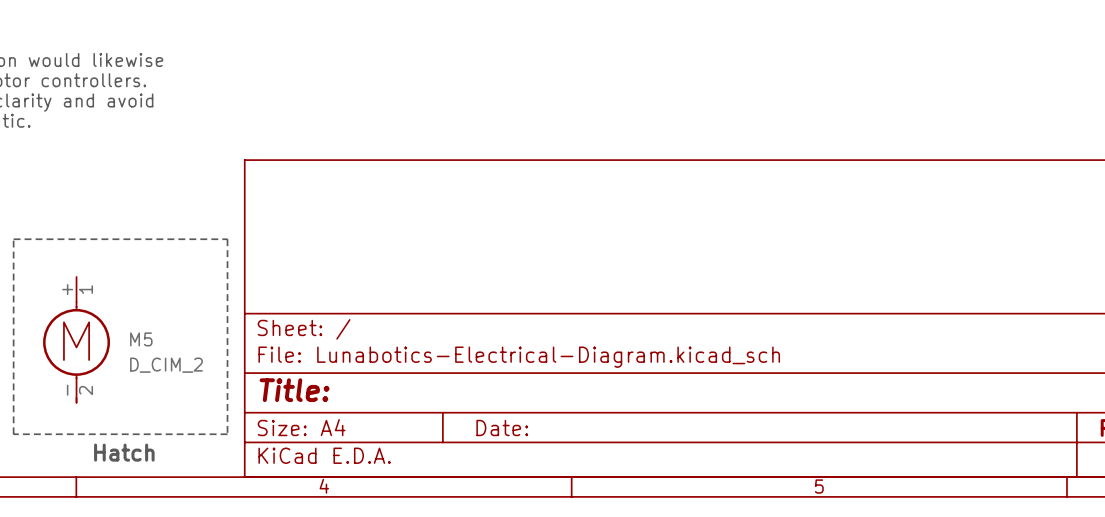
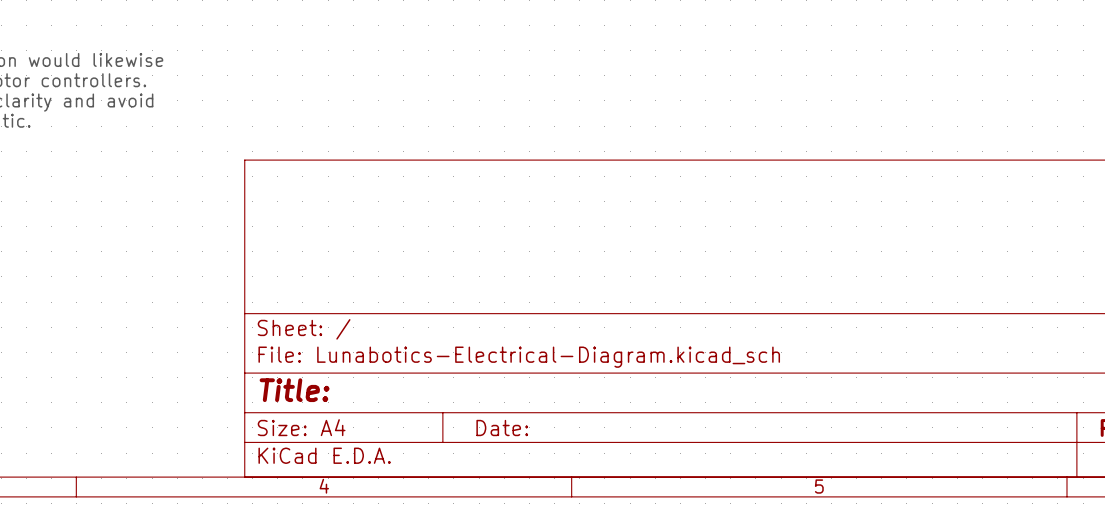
line: (13, 239) (227, 239) (227, 434) (13, 434) (13, 239) -> none
M5: D_CIM_2 (76, 339) -> none
text: Hatch (124, 452) -> none

